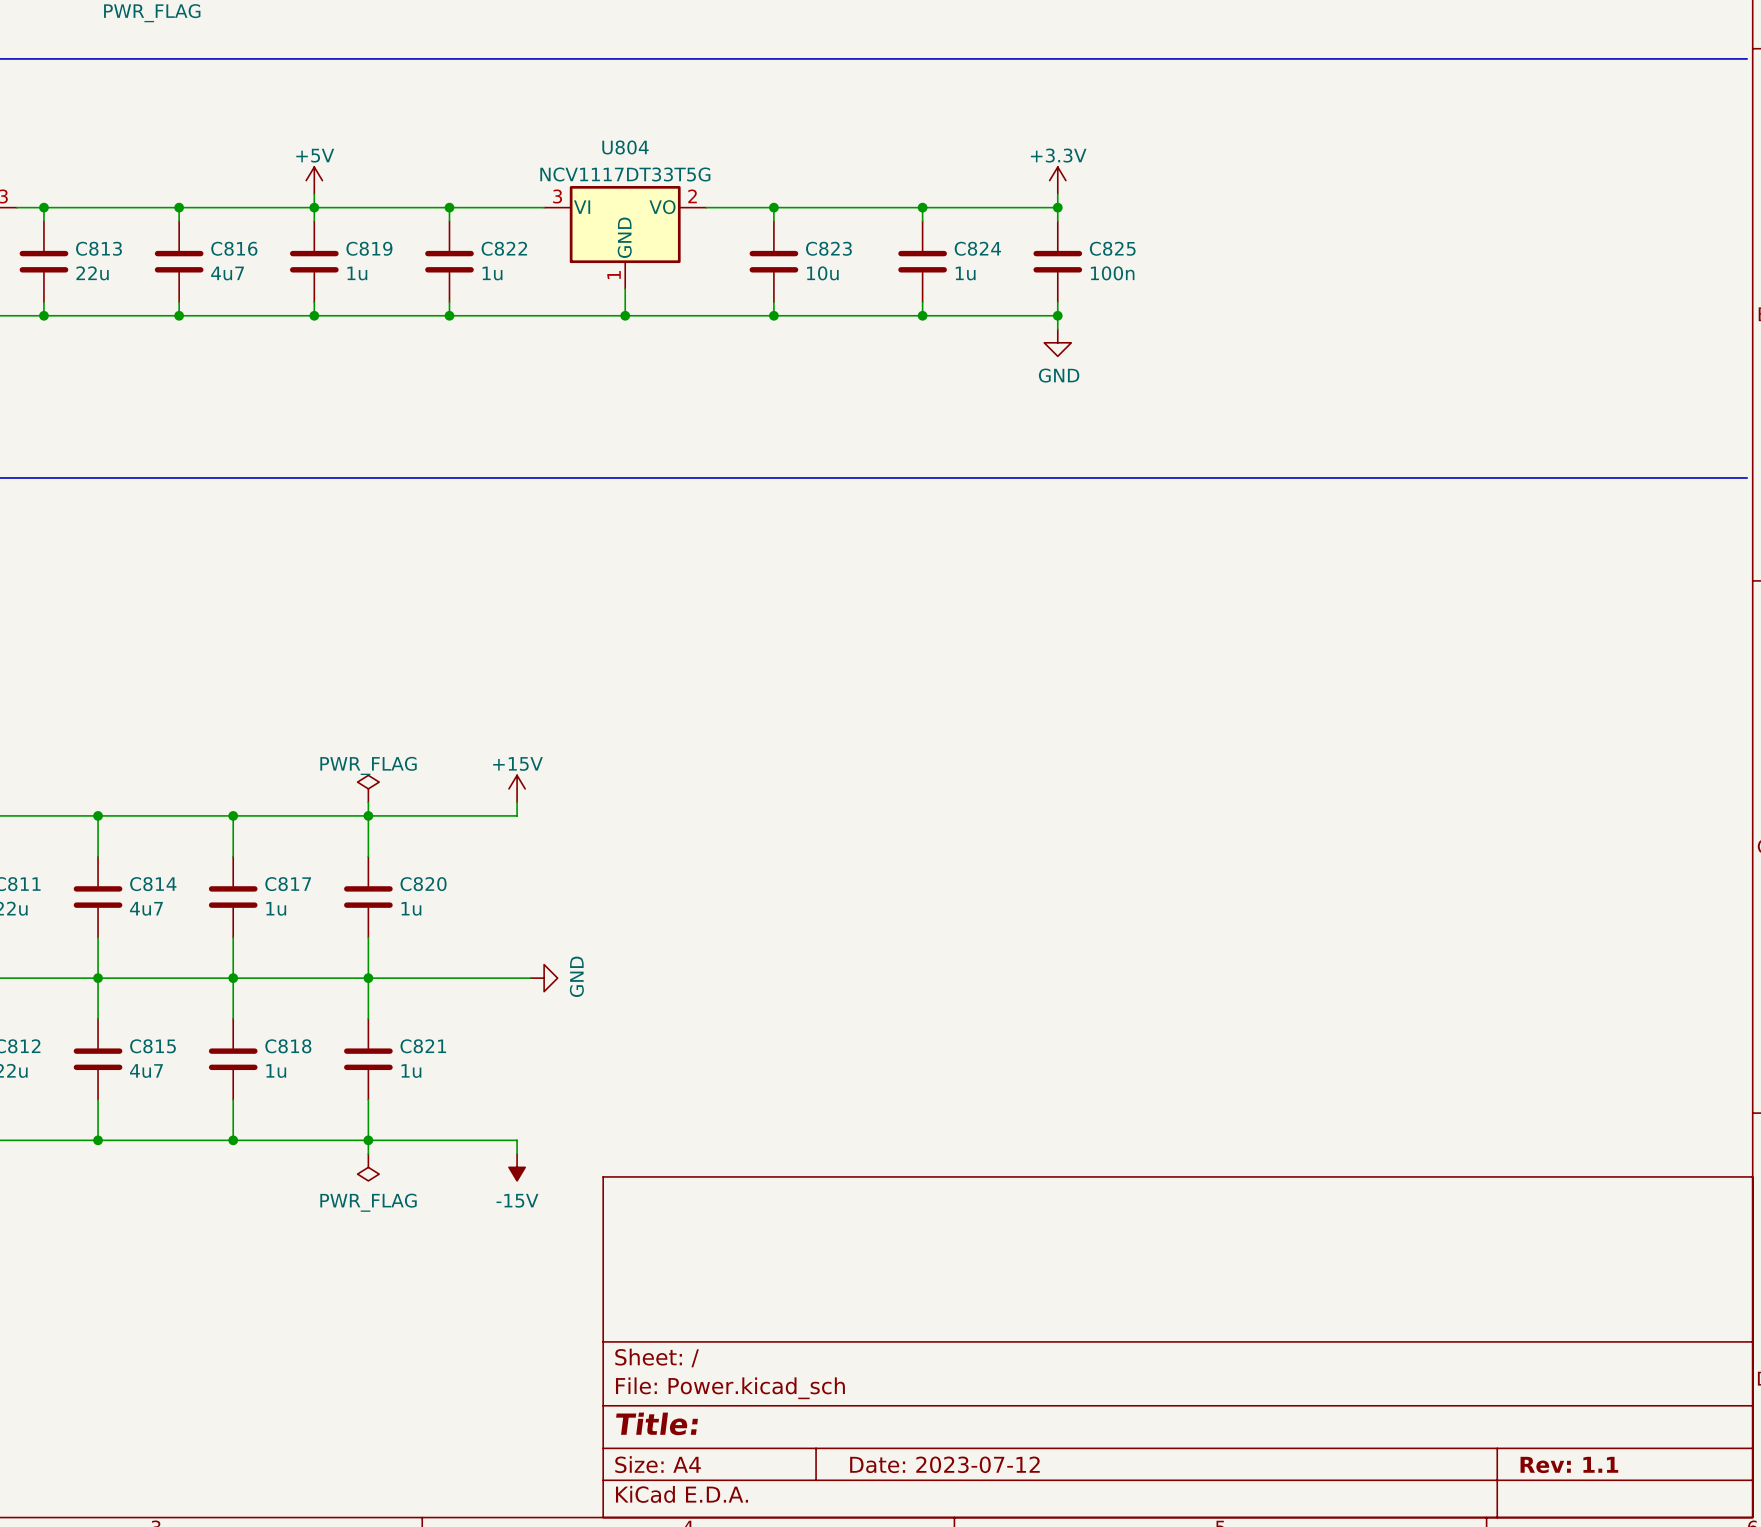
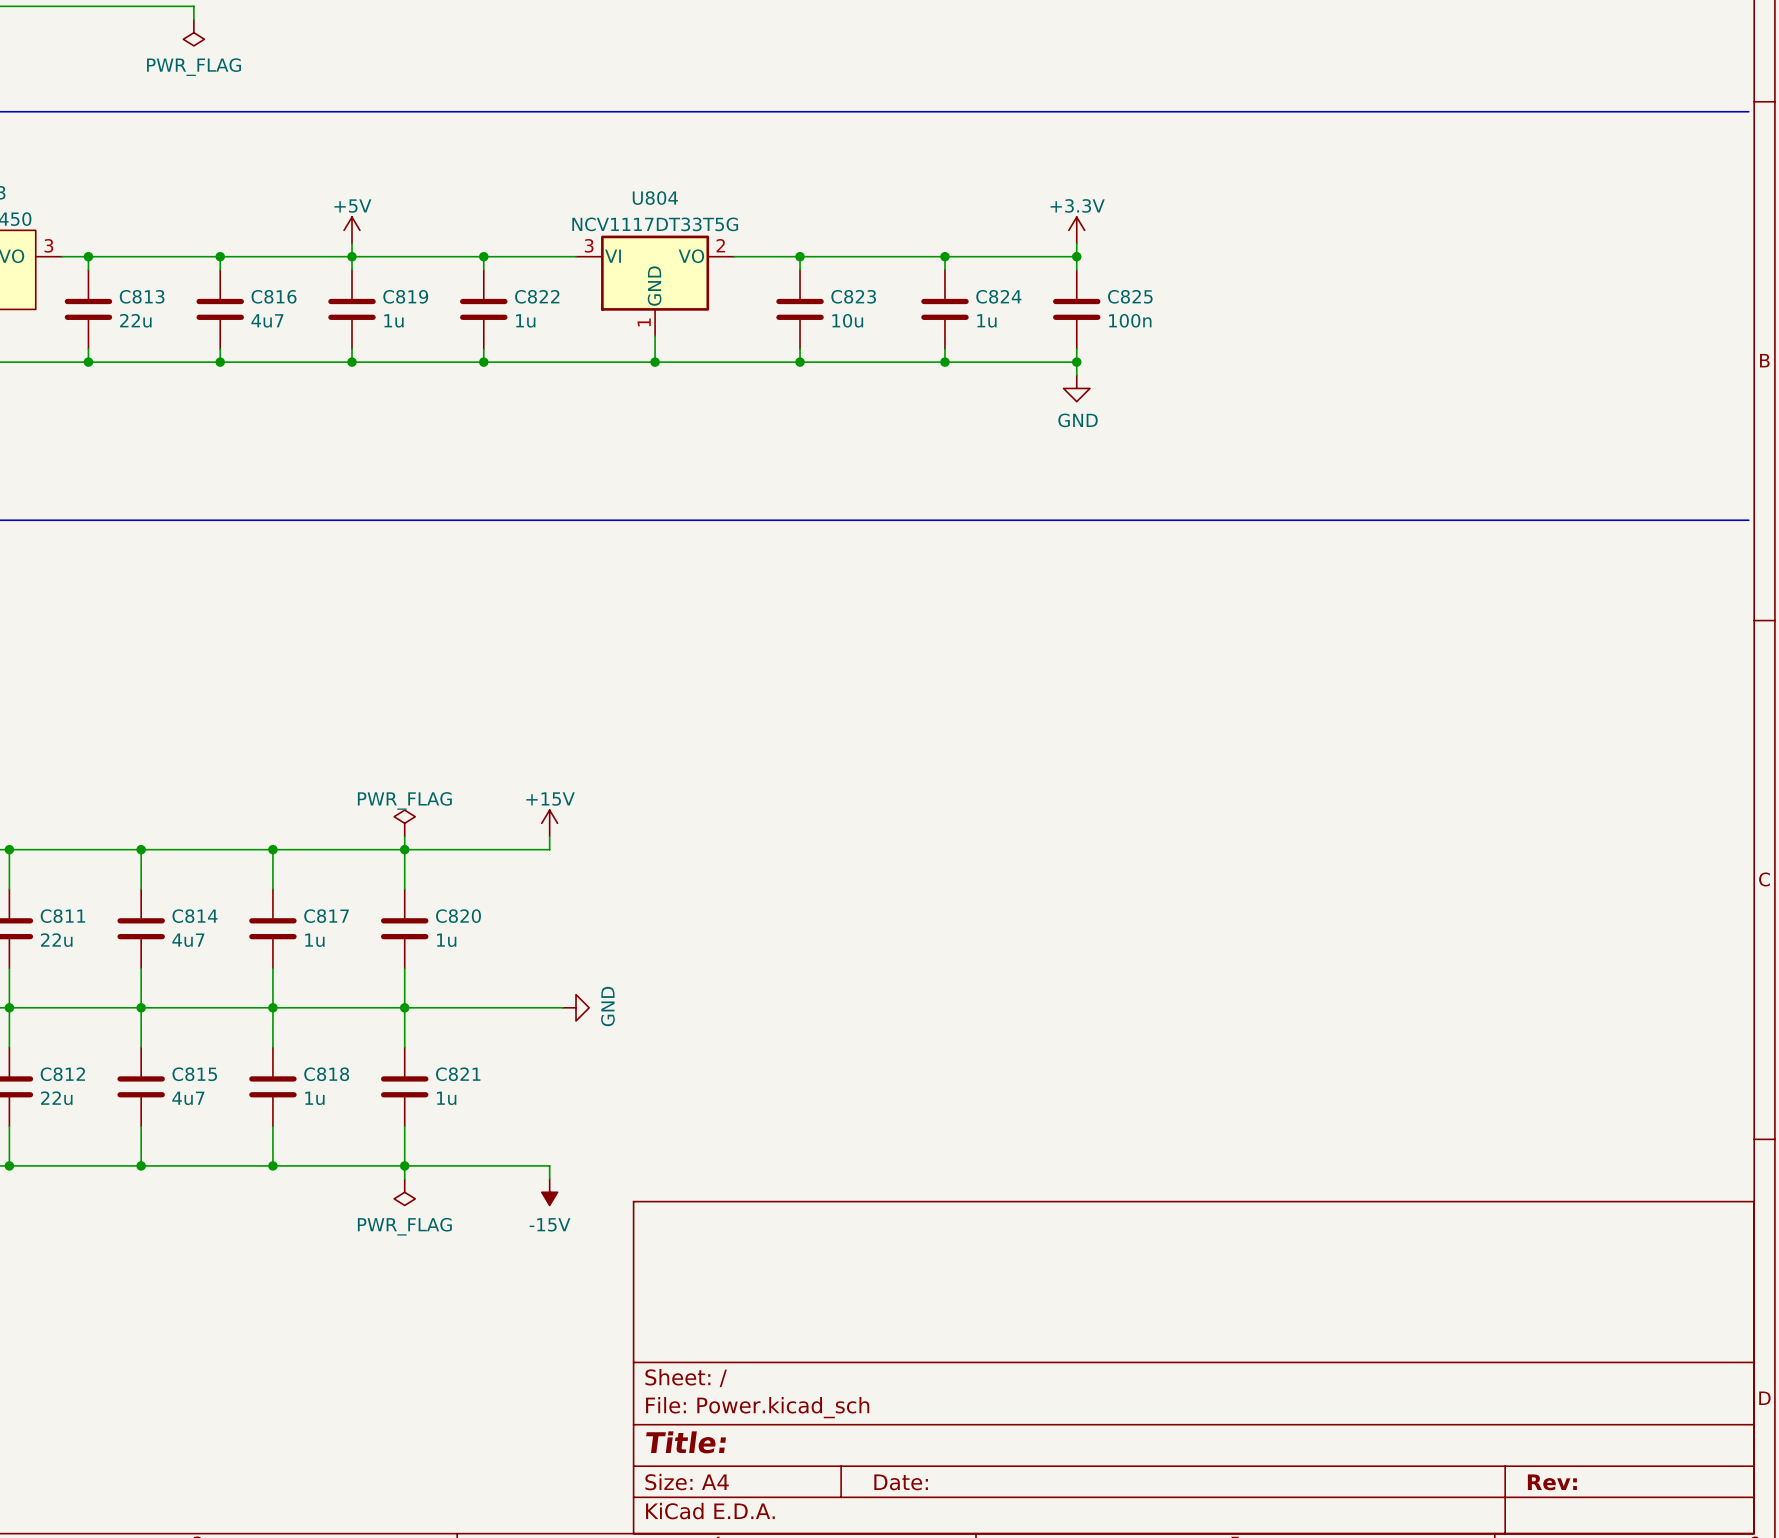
title block: Date: 2023-07-12 (944, 1464) -> Date: (901, 1482)
title block: Rev: 1.1 (1569, 1464) -> Rev: (1552, 1482)

